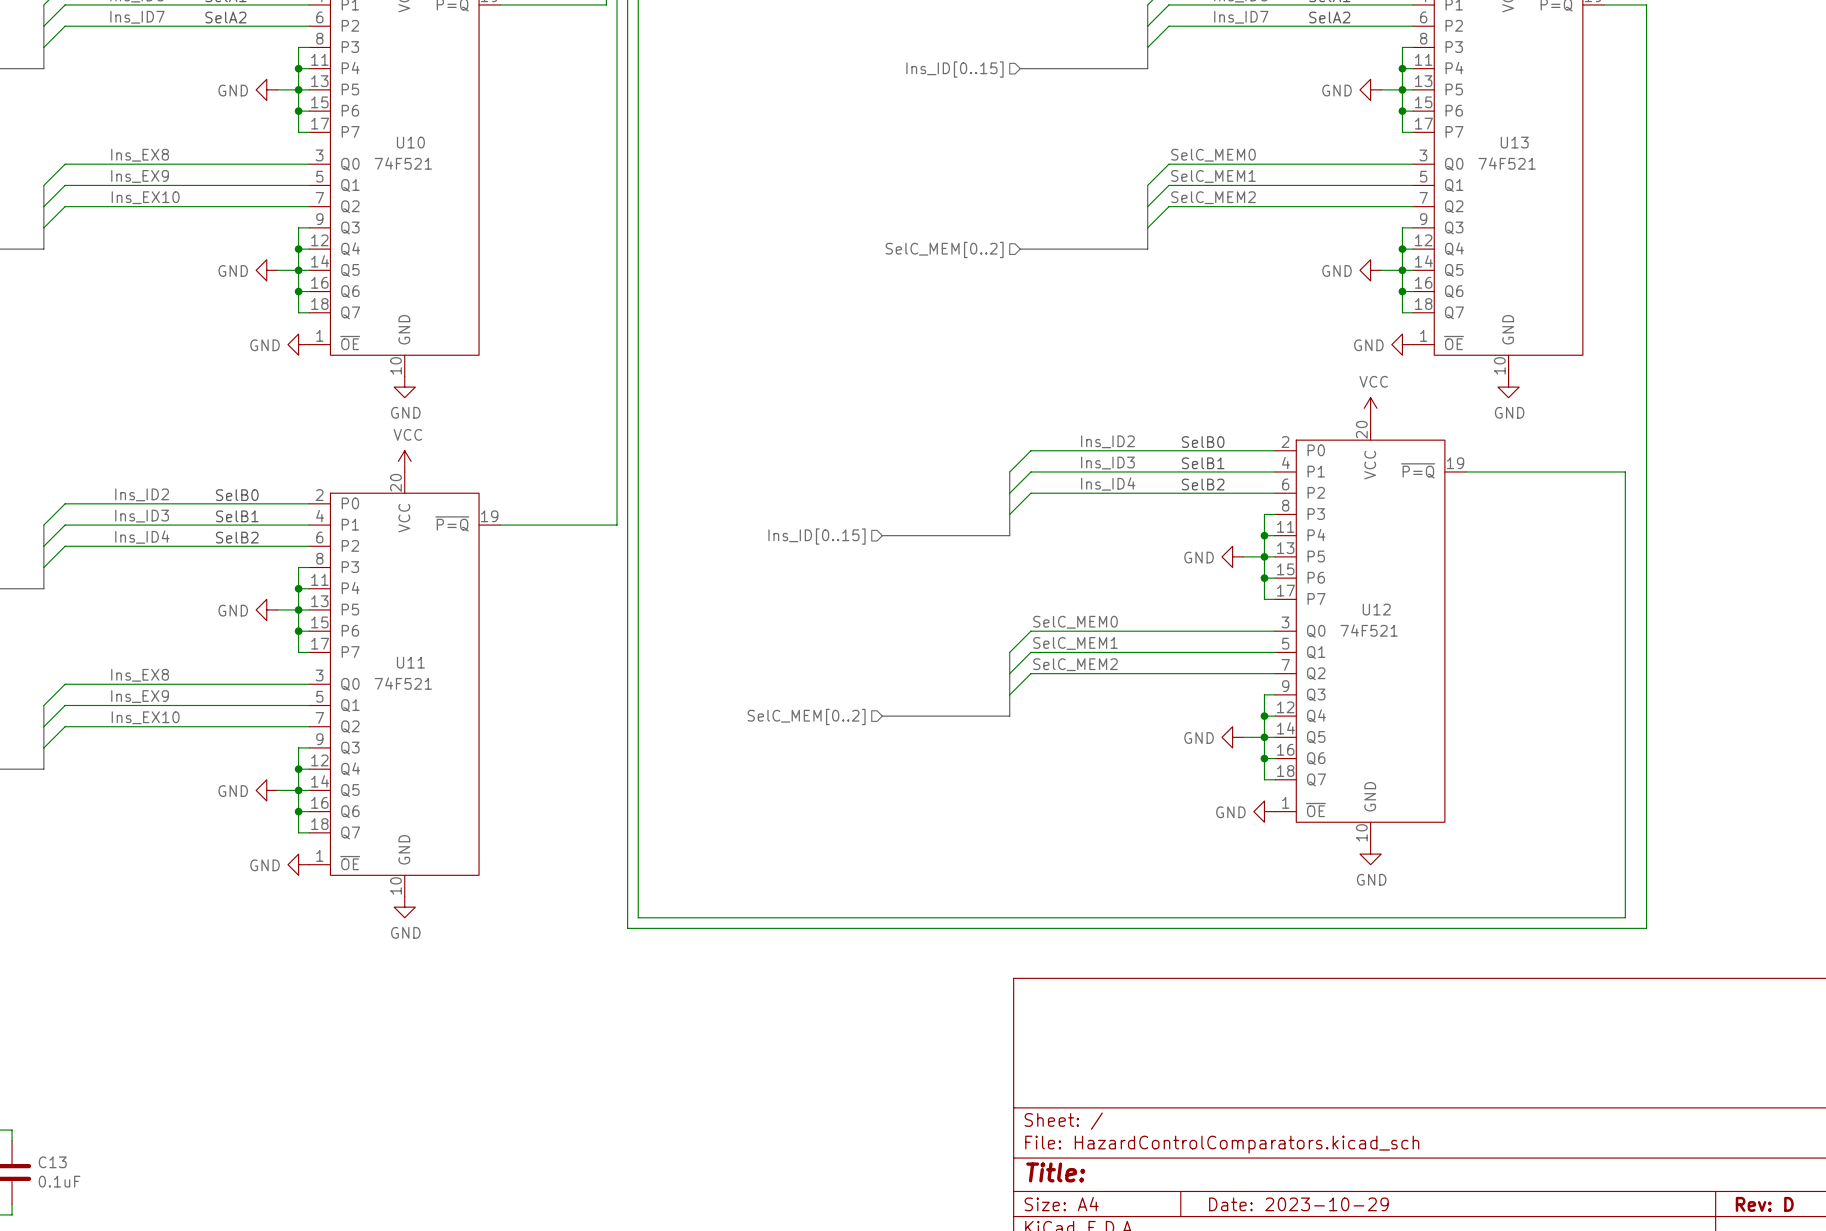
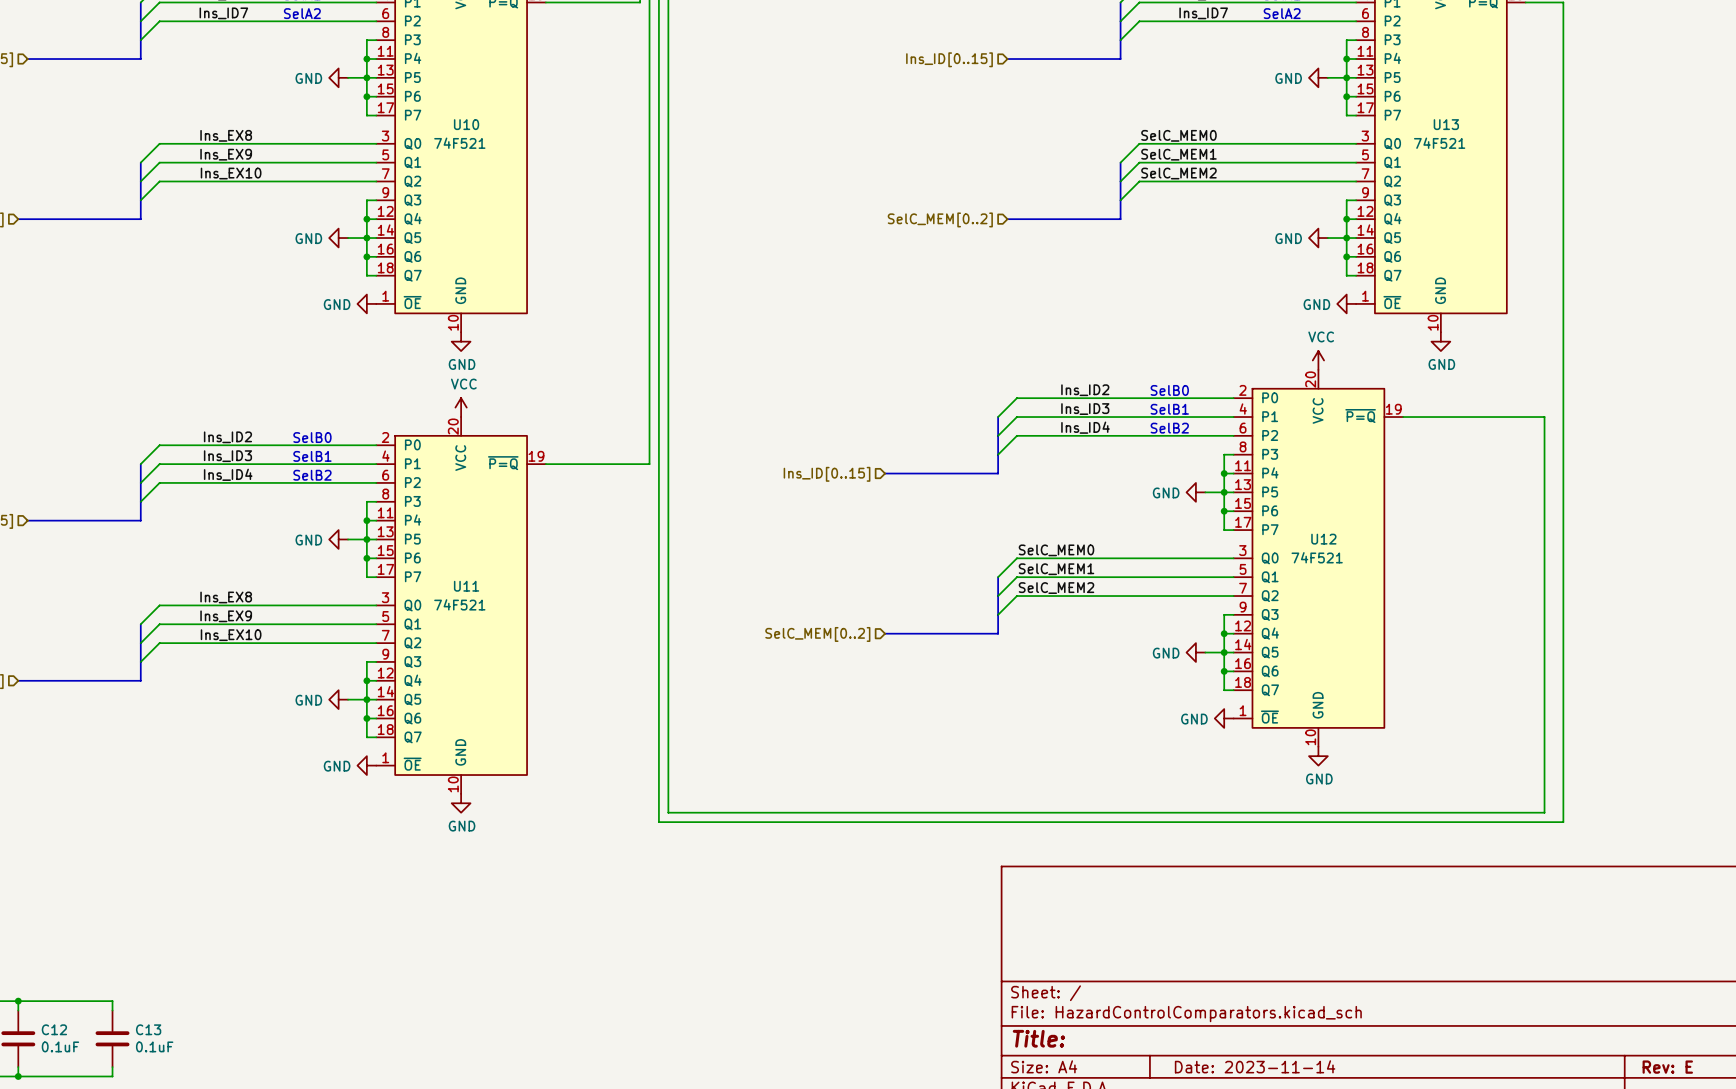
title block: Date: 2023-10-29 (1298, 1204) -> Date: 2023-11-14 (1255, 1066)
title block: Rev: D (1764, 1204) -> Rev: E (1667, 1067)

